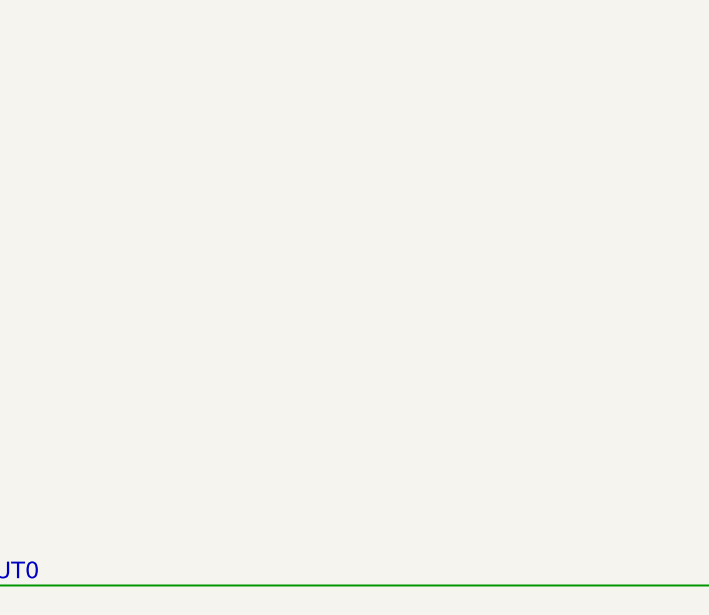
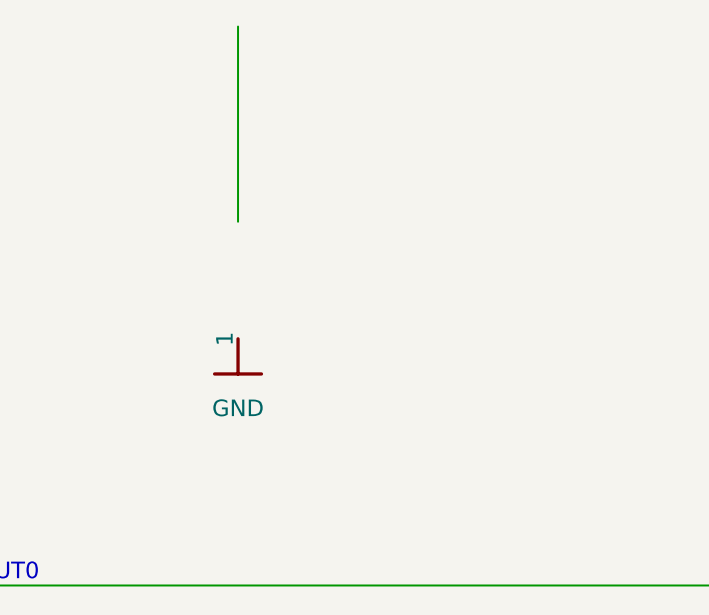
wire: none -> (238, 26) (238, 221)
GND: none -> (238, 356)

